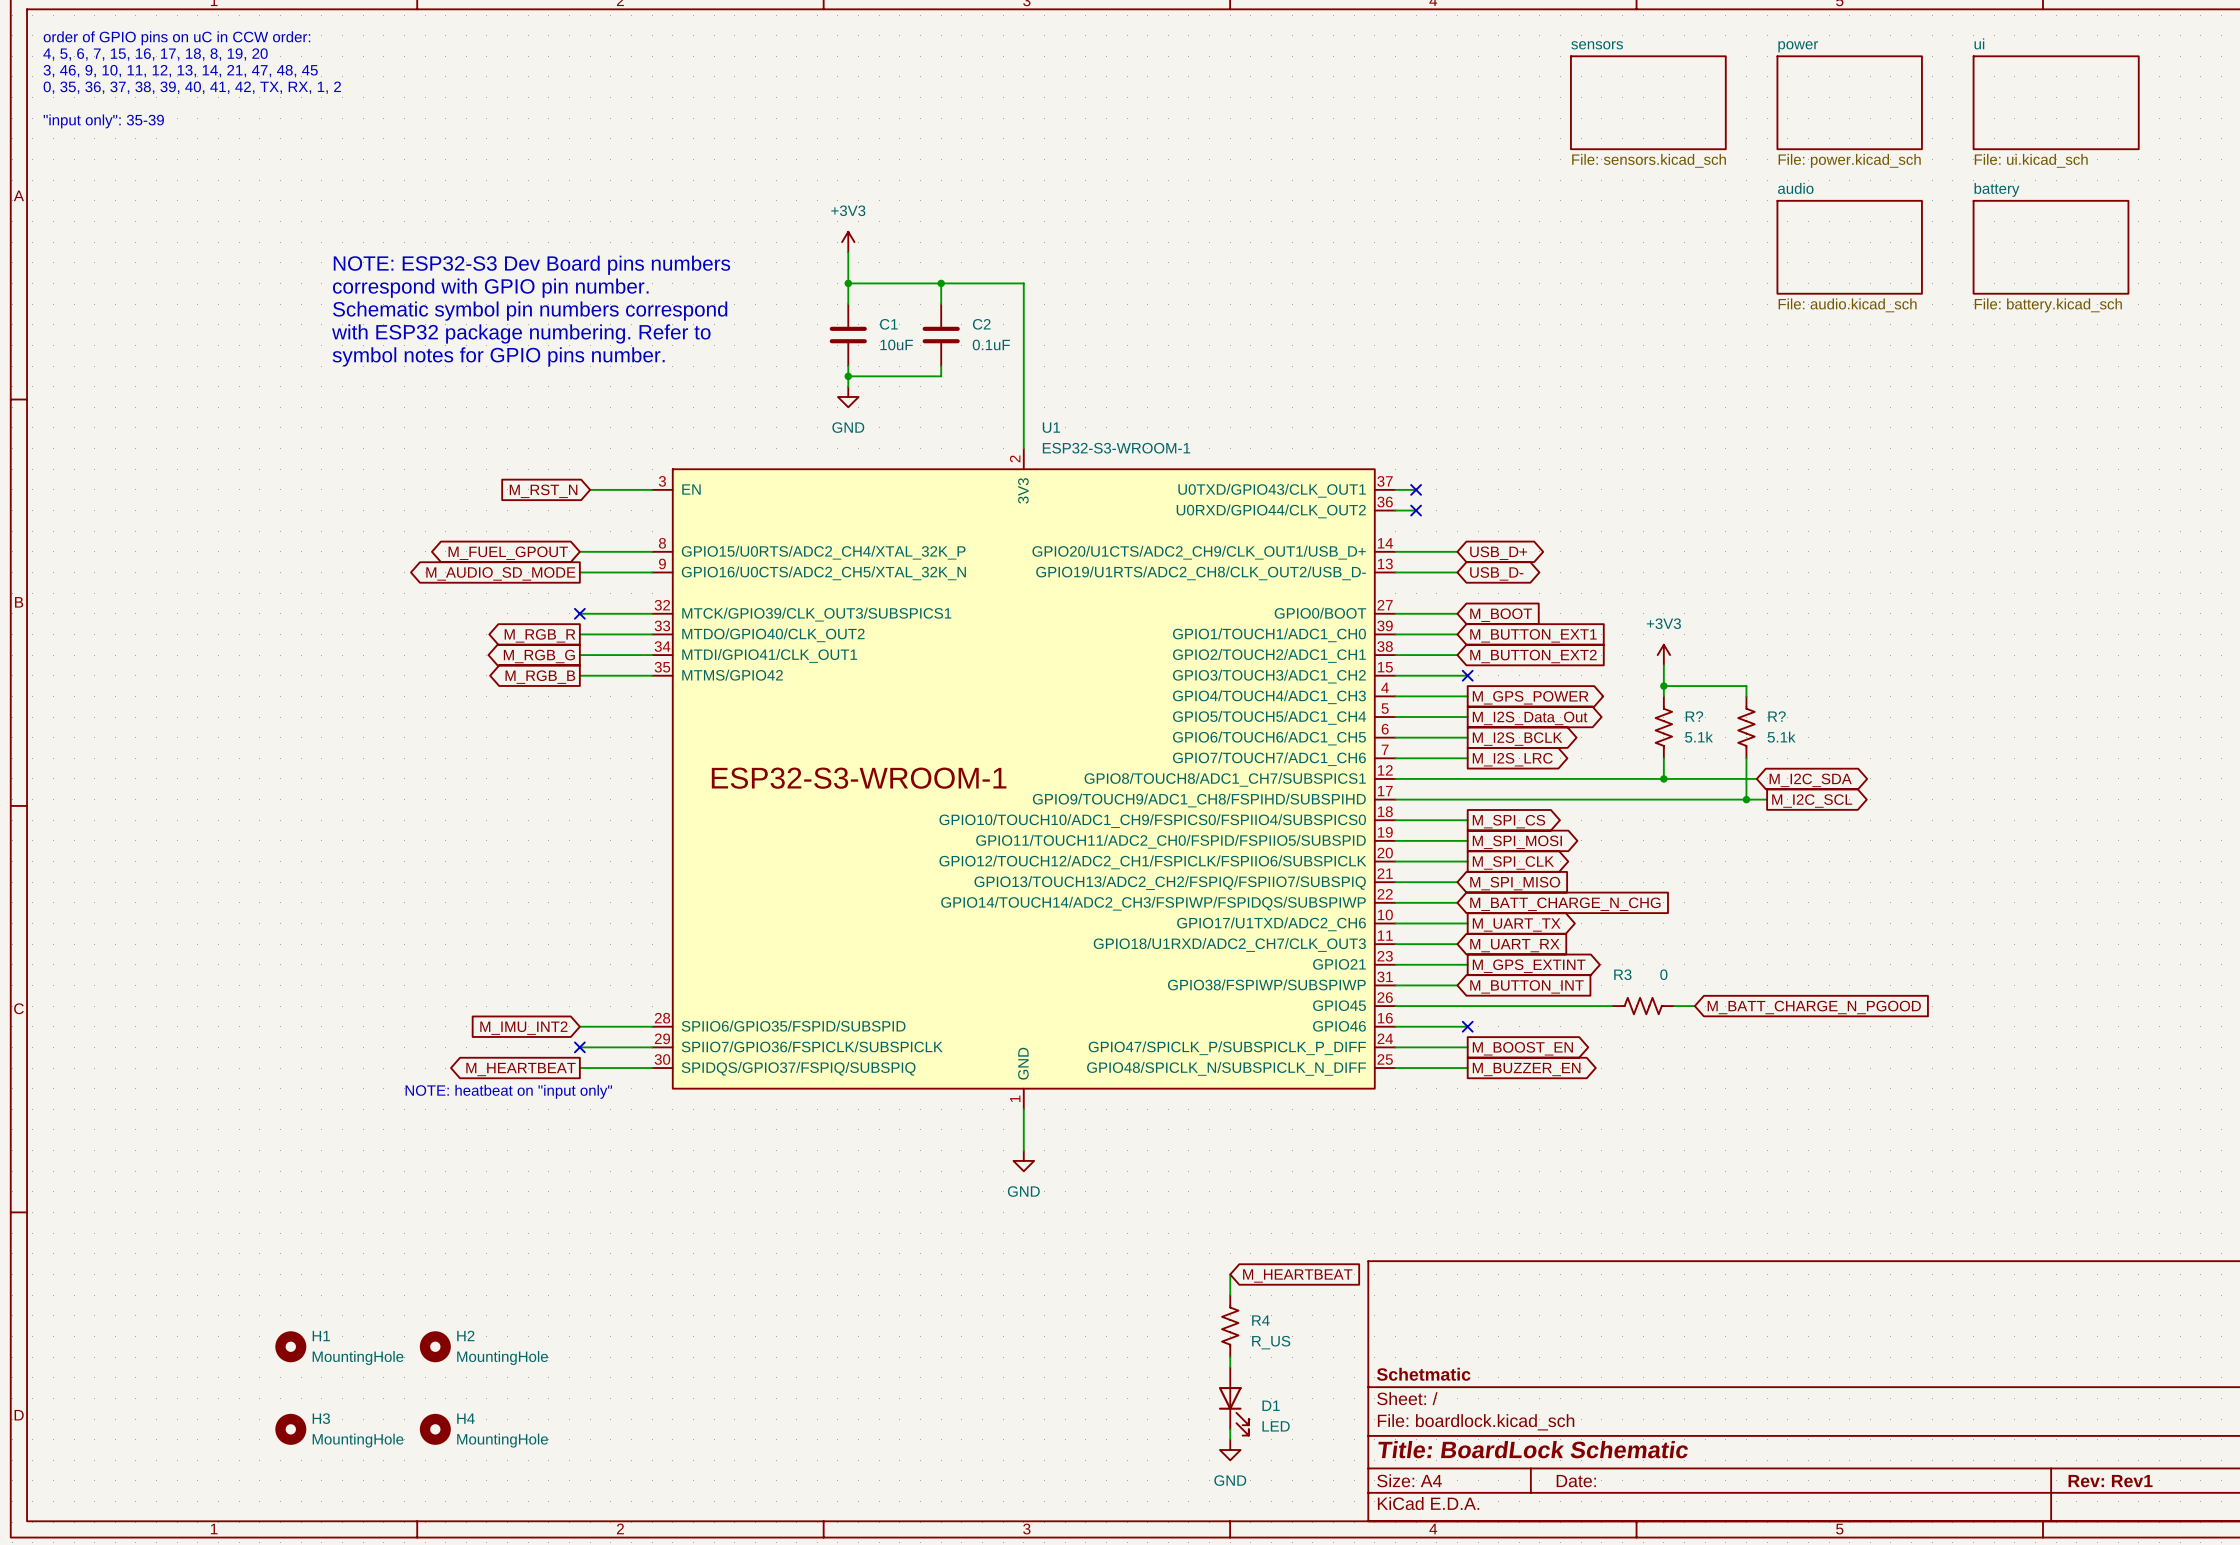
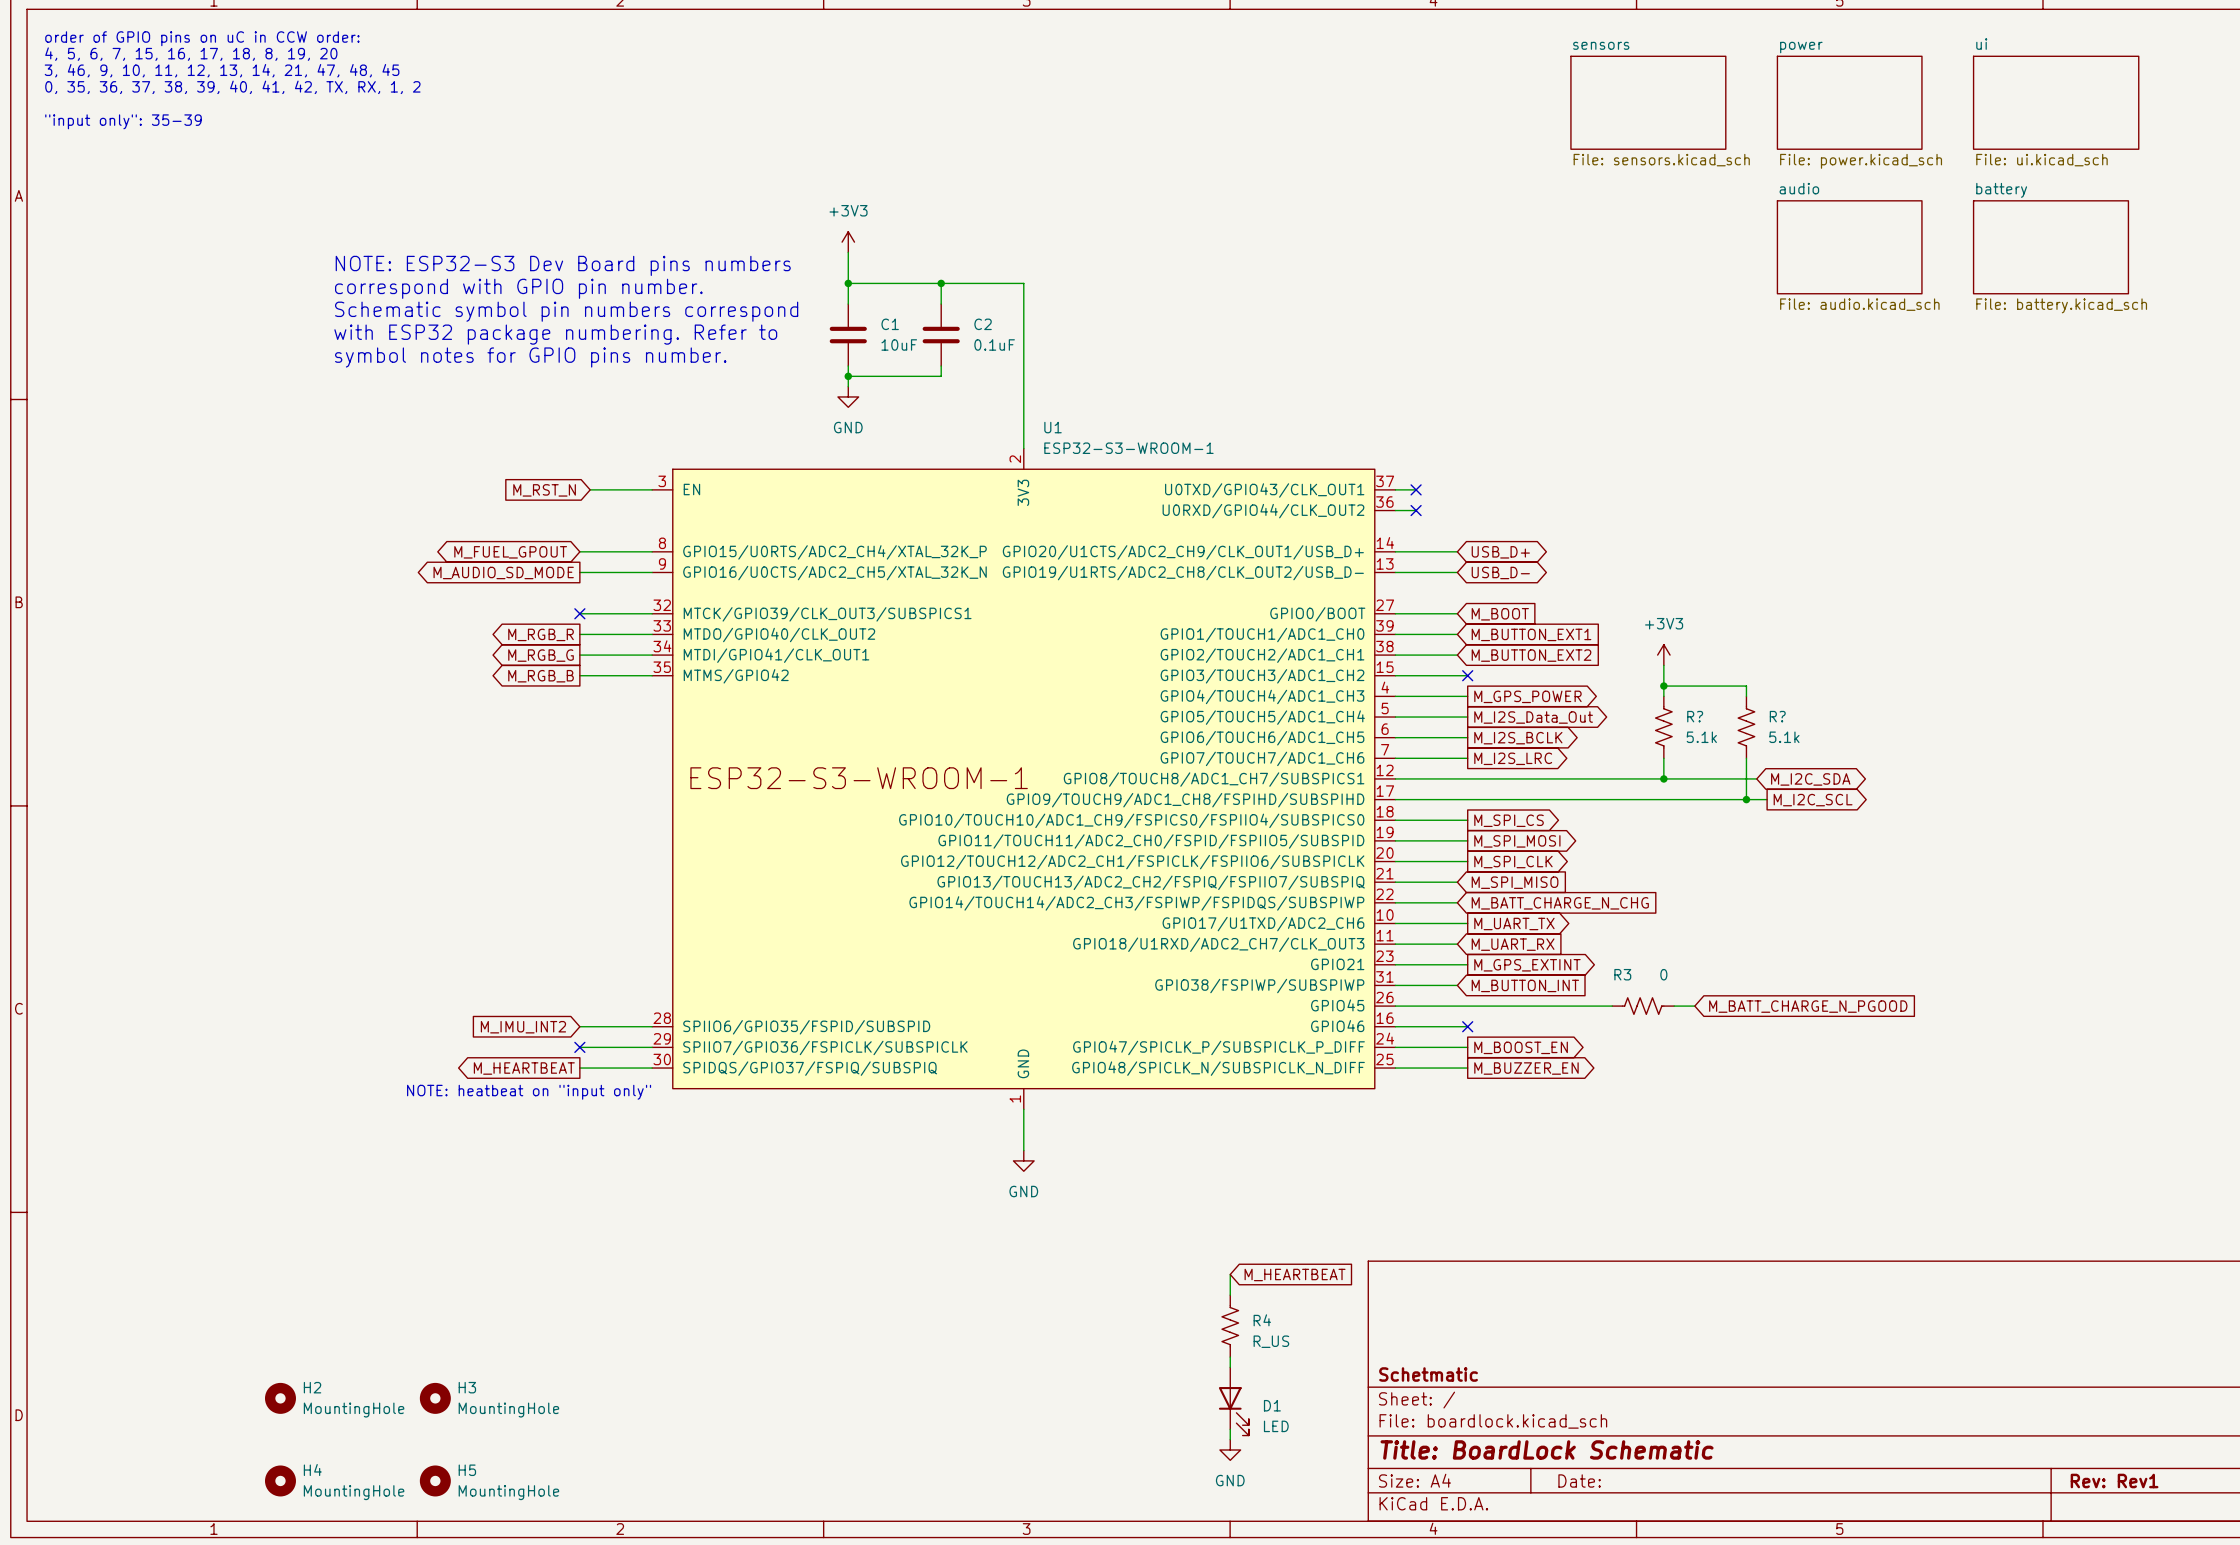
H1: MountingHole (290, 1346) -> none
H2 position: (435, 1346) -> (280, 1398)
H3 position: (290, 1429) -> (435, 1398)
H4 position: (435, 1429) -> (280, 1480)
H5: none -> MountingHole (435, 1480)

